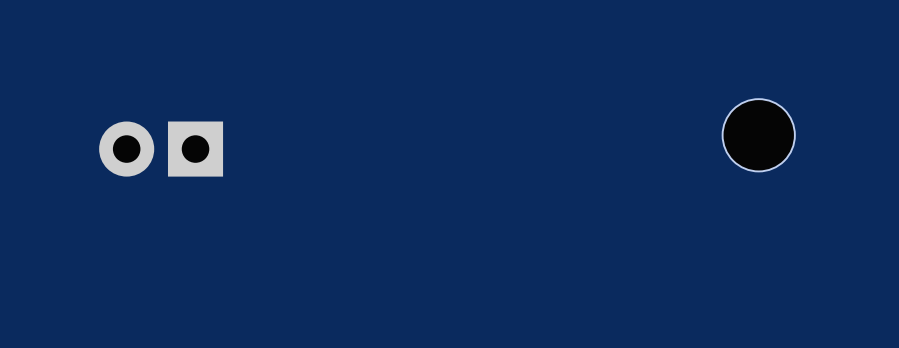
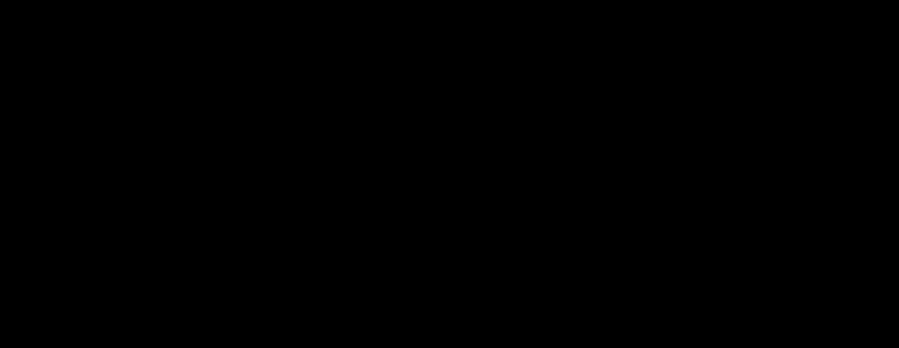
part: (758, 135) -> none
part: (161, 149) -> none

